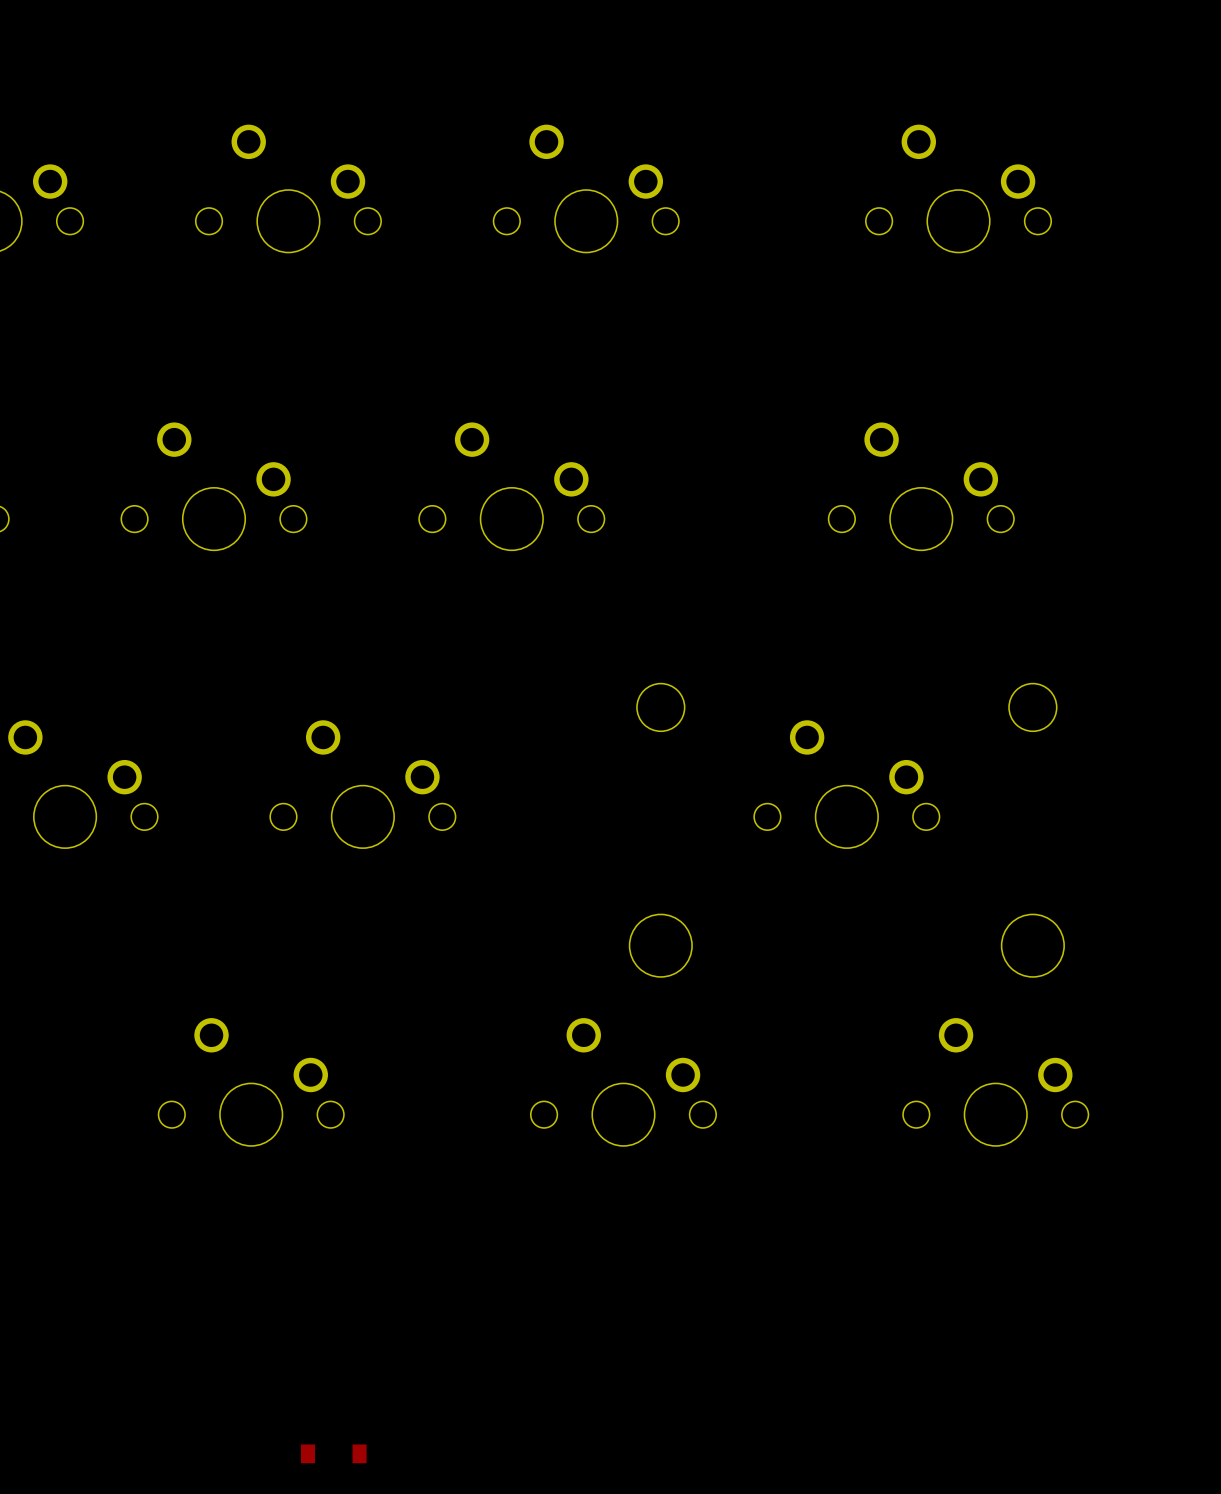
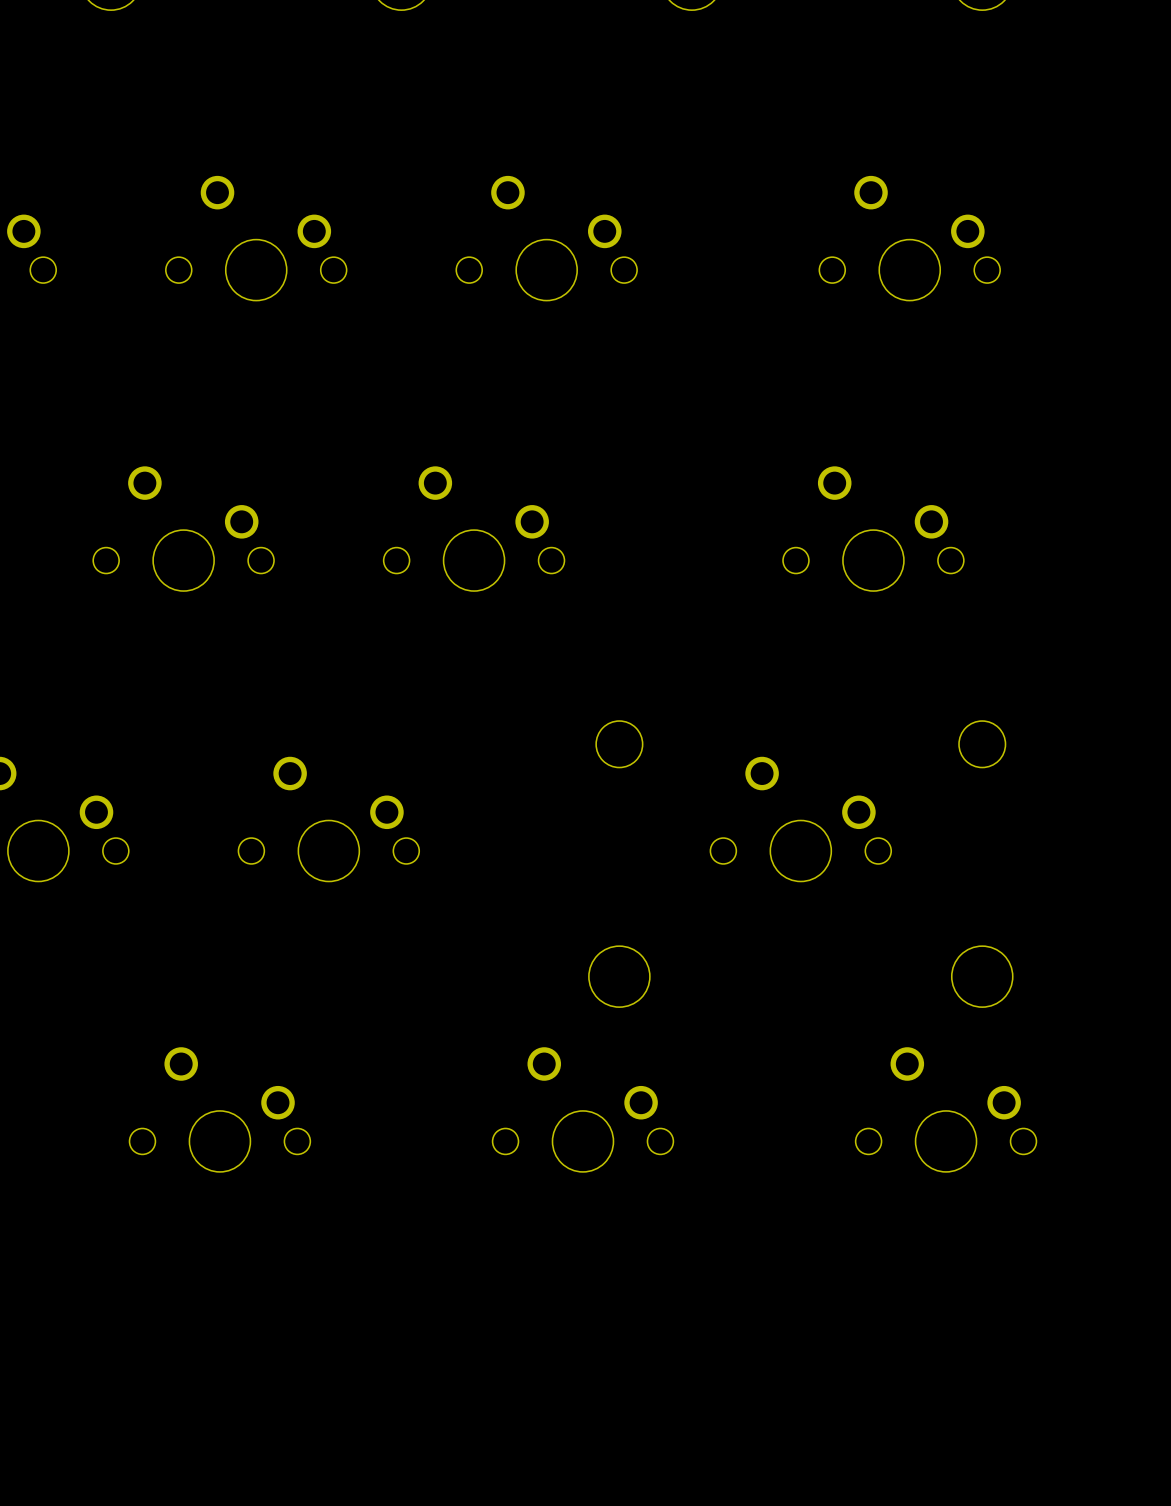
part: (333, 1453) -> none

